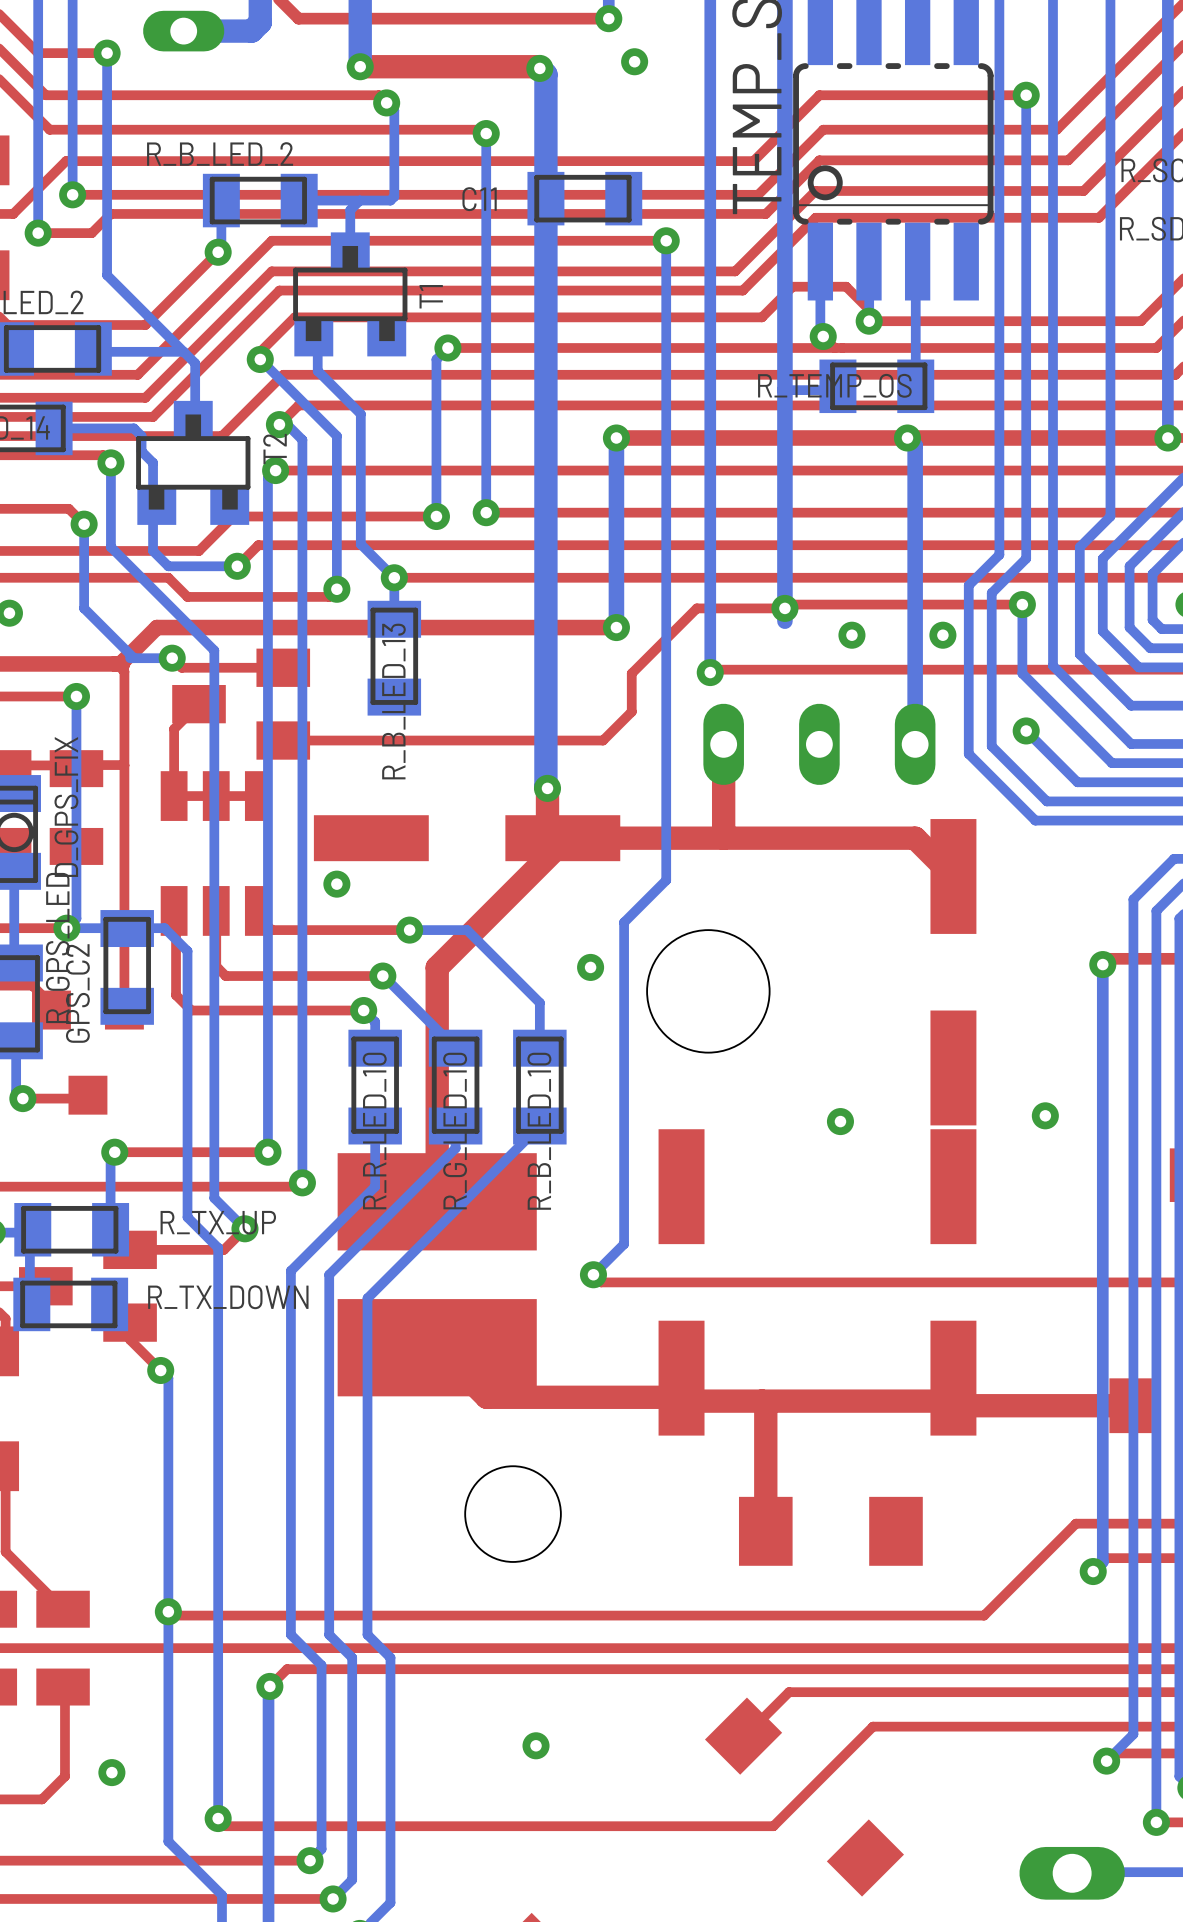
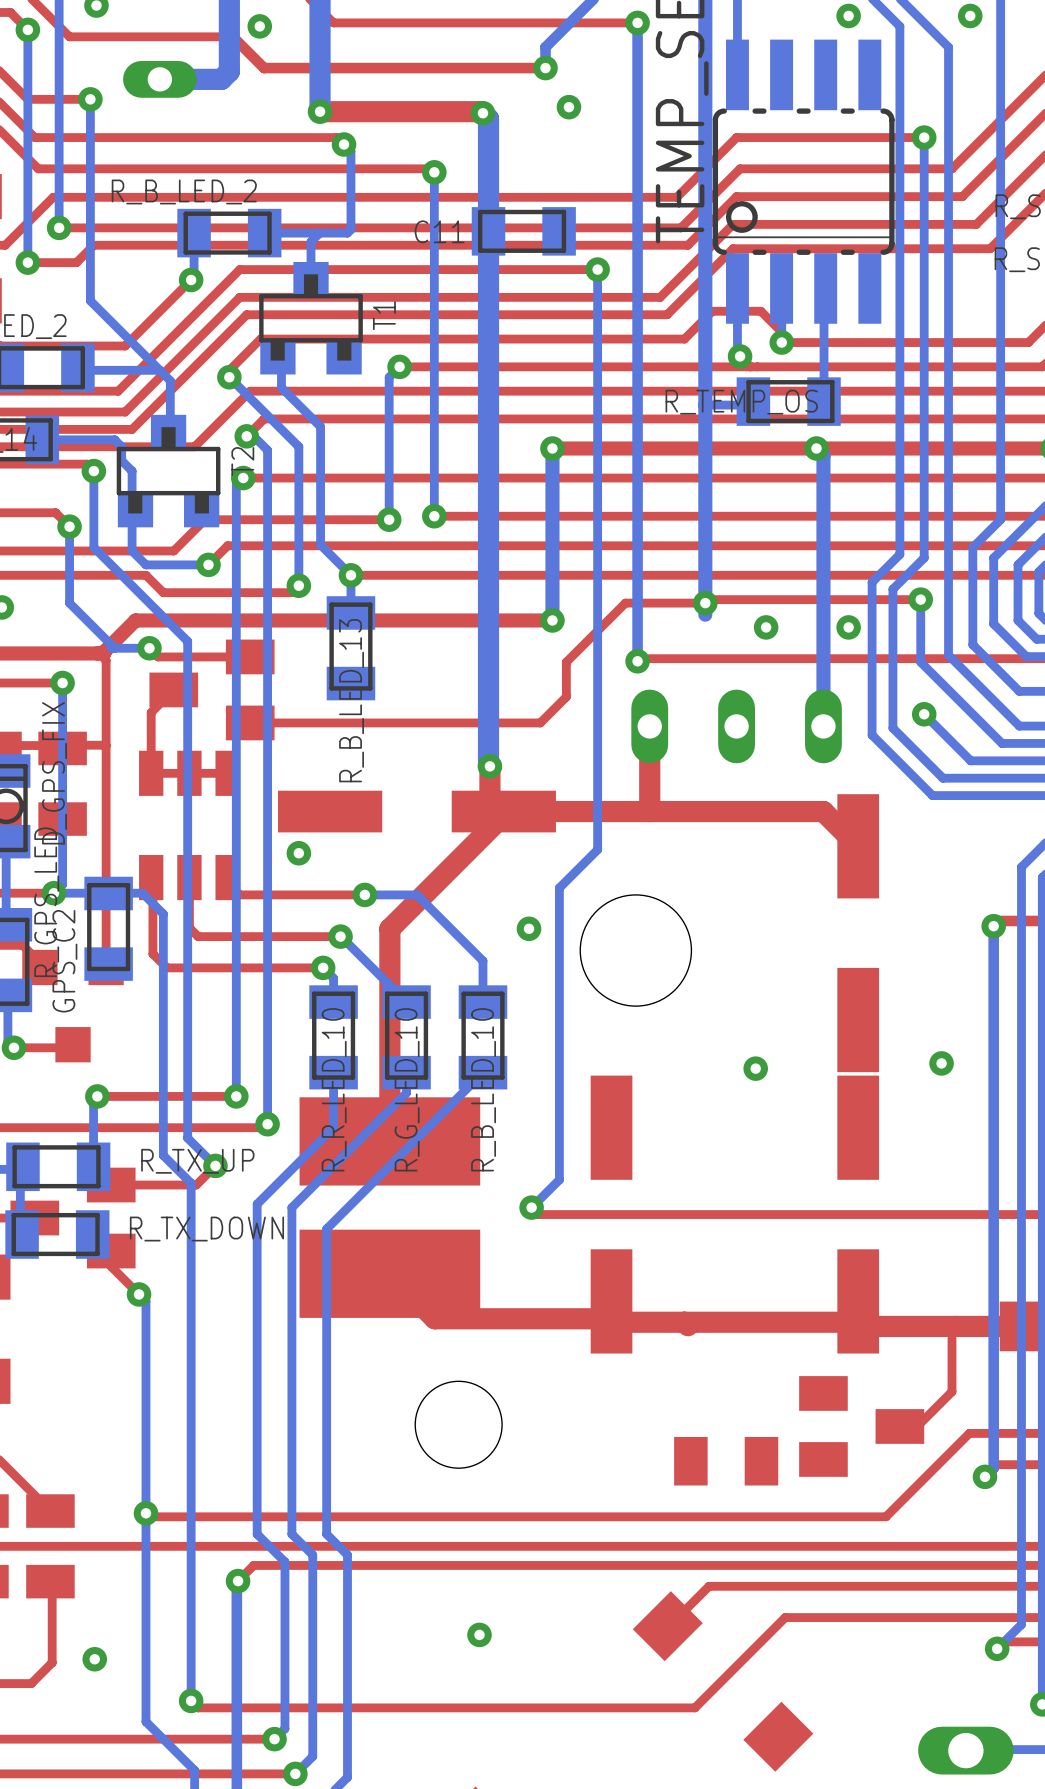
top track: (765, 1404) (765, 1531) -> none
top track: none -> (955, 1326) (951, 1329) (951, 1391) (917, 1426) (899, 1426)
part footprint: [738, 1496, 923, 1566] -> [674, 1436, 779, 1486]
part: none -> (861, 1426)

